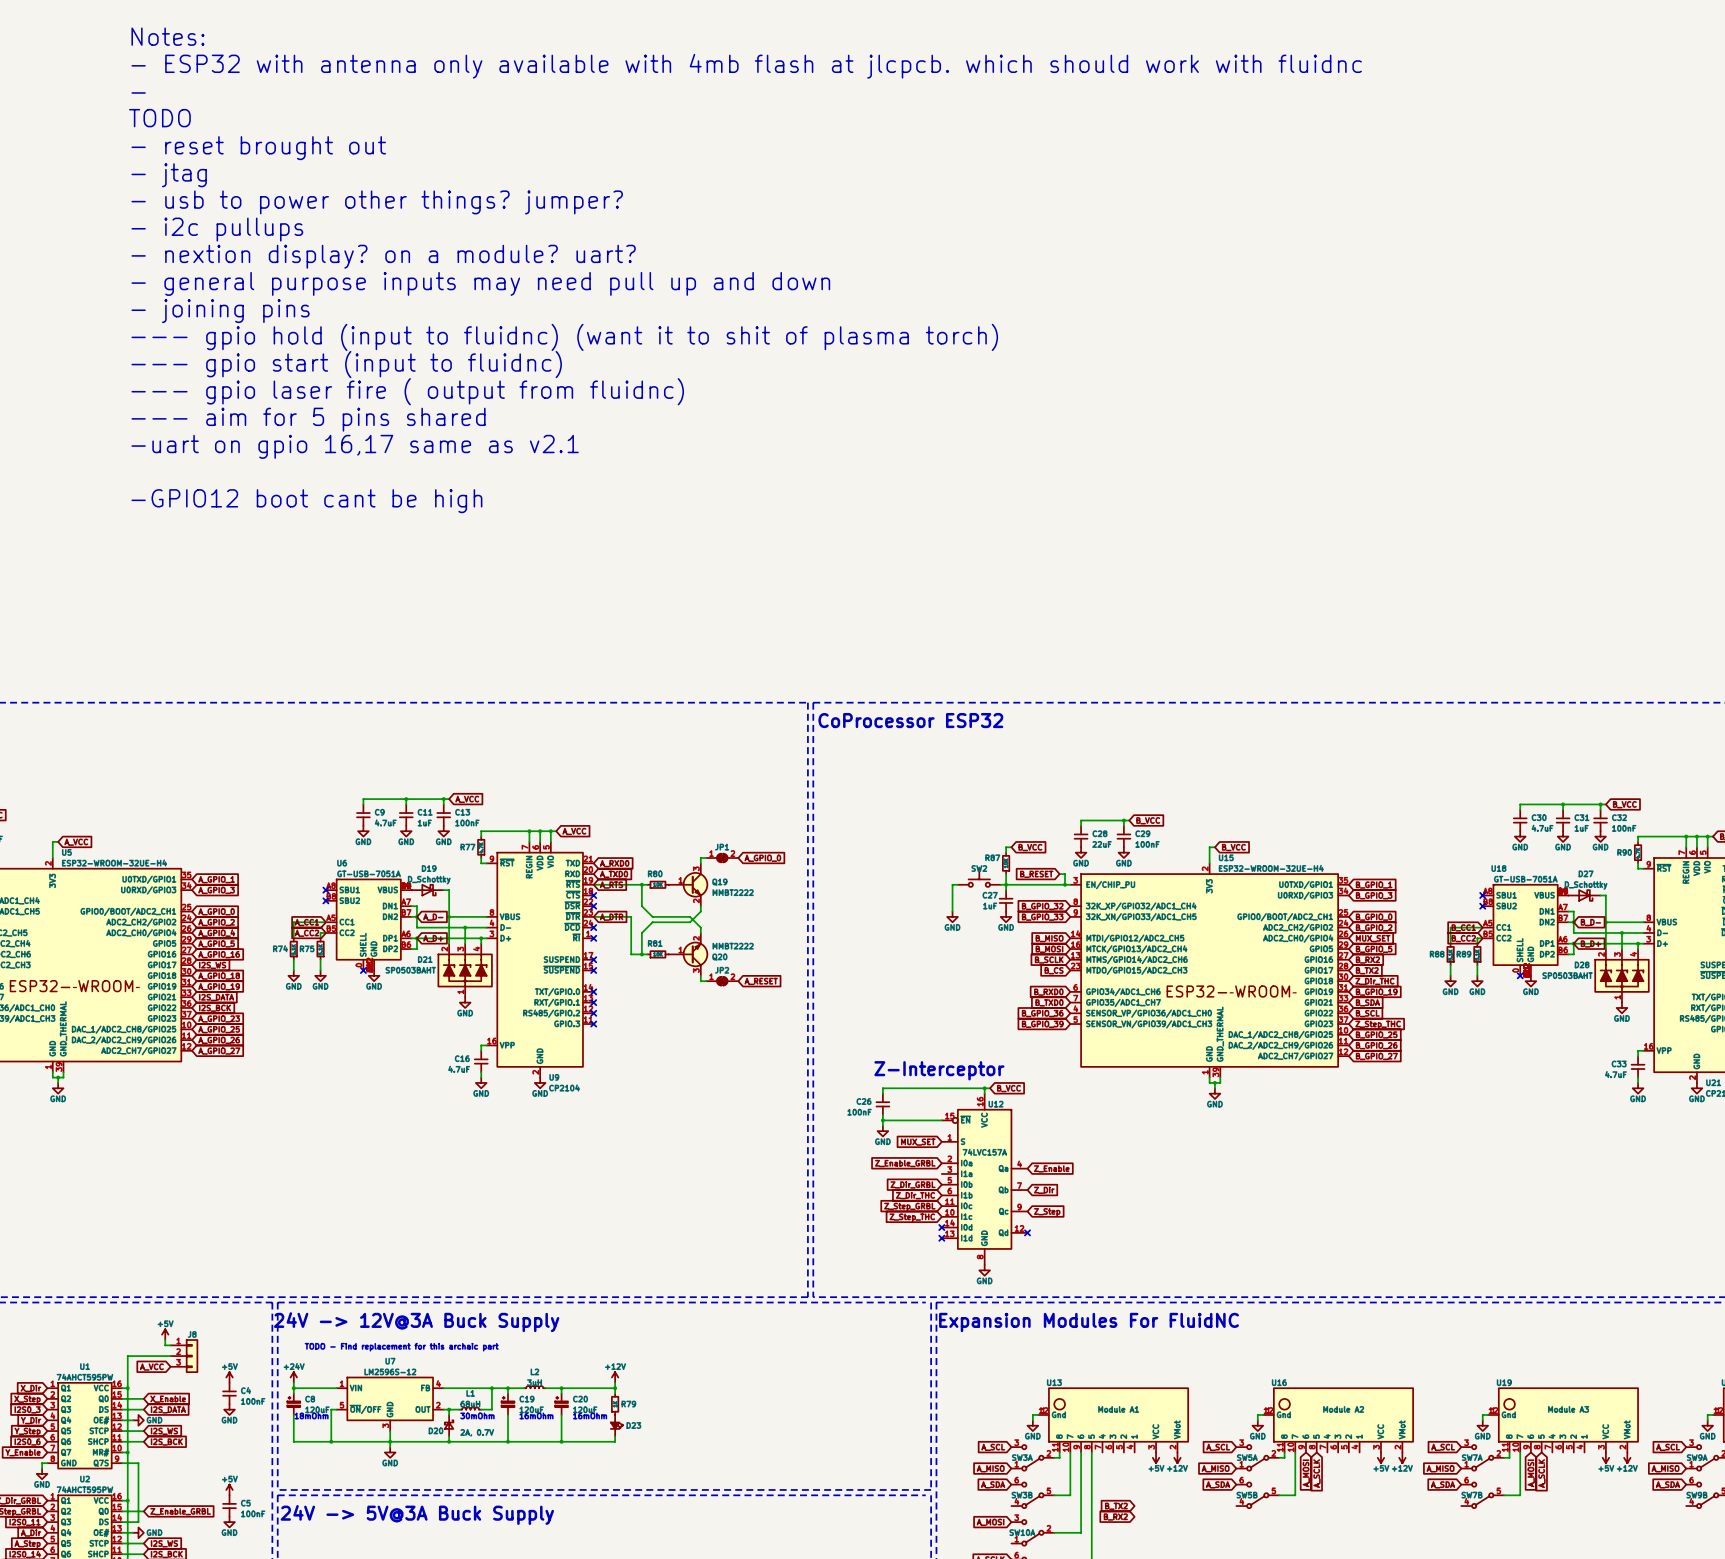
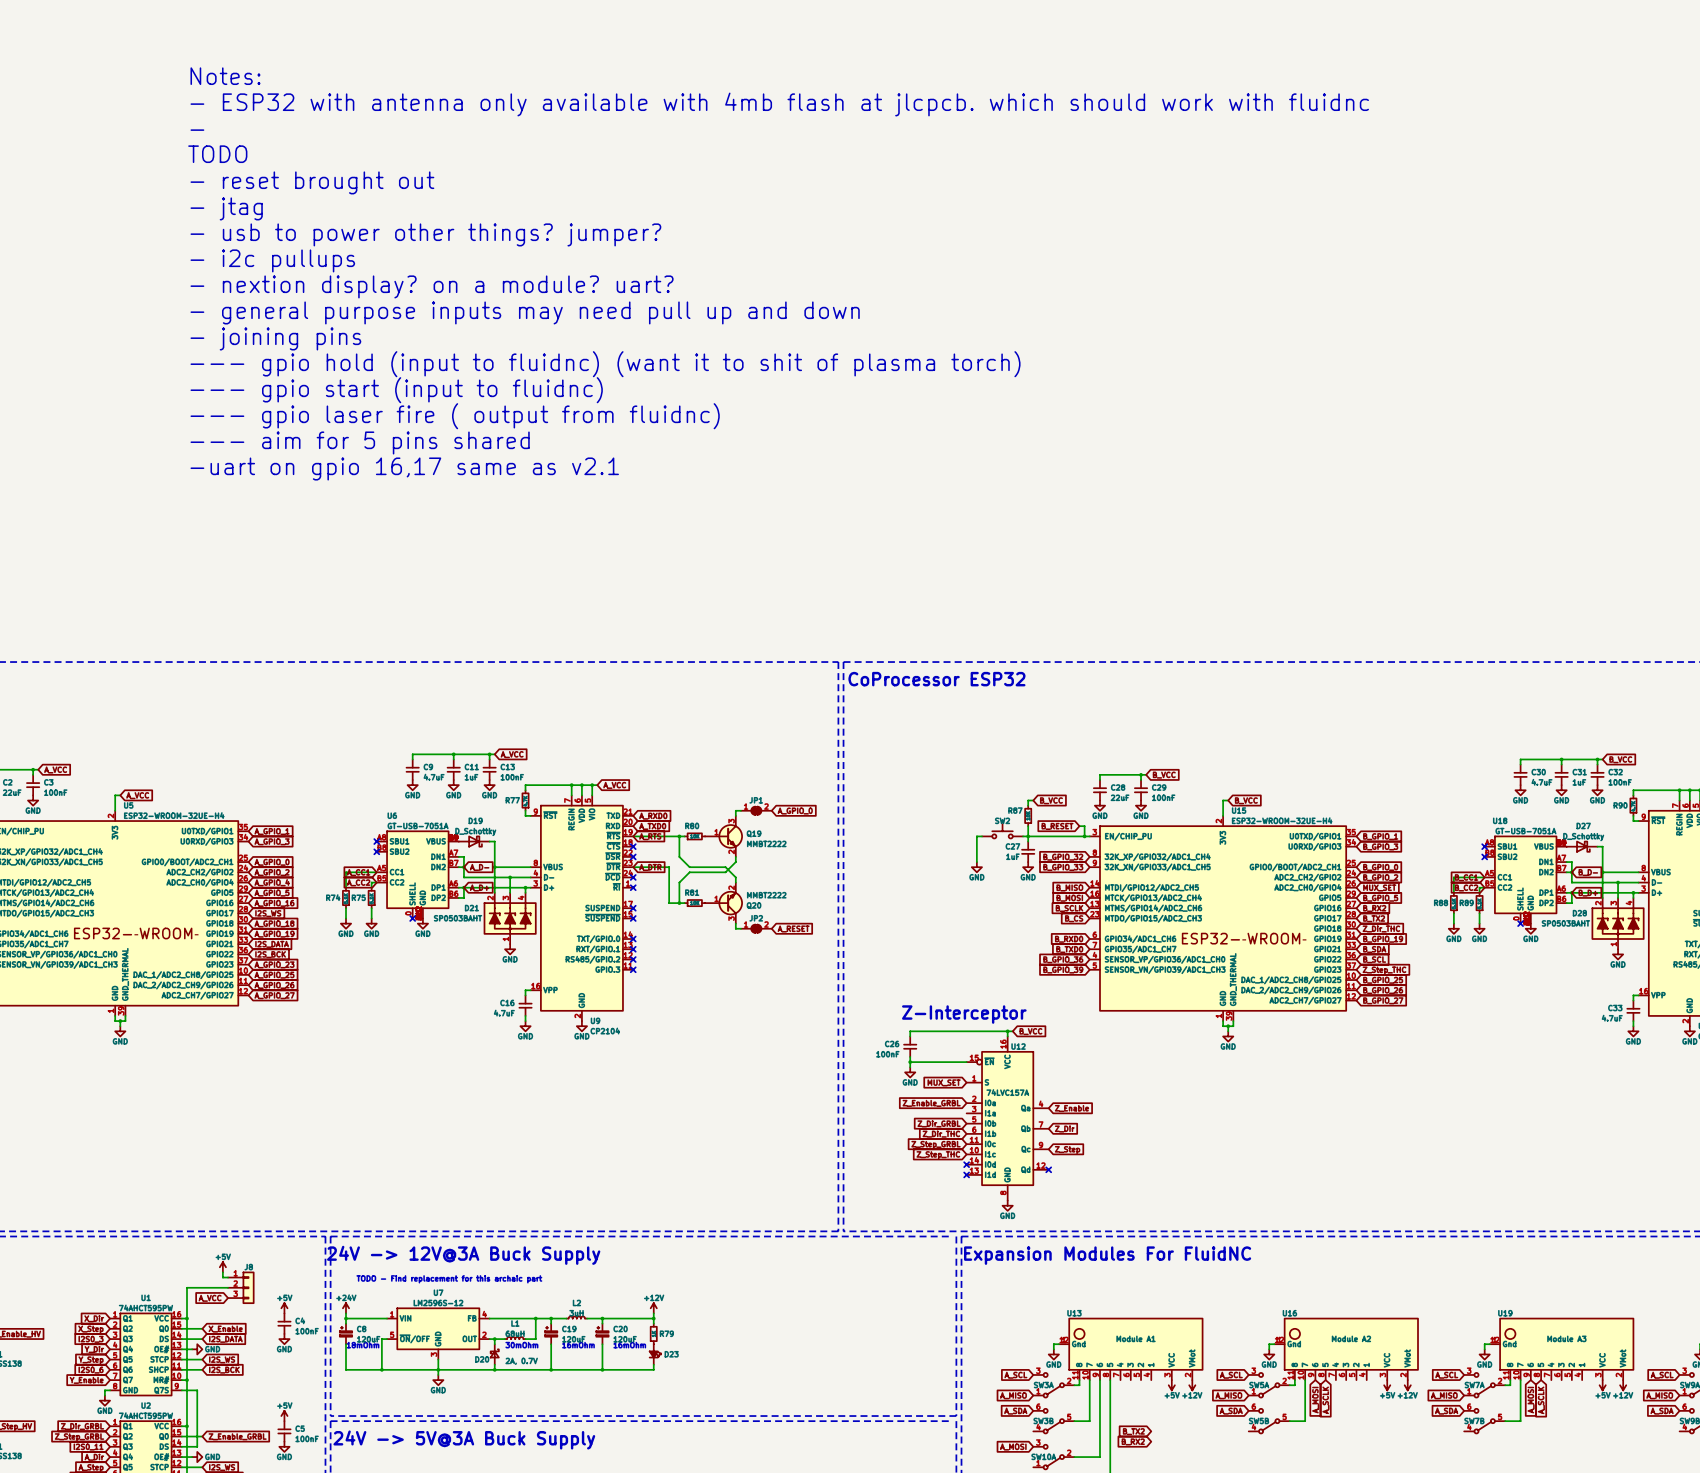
text: Notes: (167, 36) -> none
text: - ESP32 with antenna only available with 4mb flash at jlcpcb. which should work with fluidnc (746, 66) -> none
text: - (138, 92) -> Notes: (225, 76)
text: TODO (159, 118) -> - ESP32 with antenna only available with 4mb flash at jlcpcb. which should work with fluidnc (779, 104)
text: - reset brought out (258, 148) -> - (197, 130)
text: - jtag (169, 175) -> TODO (217, 154)
text: - usb to power other things? jumper? (377, 202) -> - reset brought out (312, 182)
text: - i2c pullups (217, 229) -> - jtag (226, 208)
text: - nextion display? on a module? uart? (383, 256) -> - usb to power other things? jumper? (425, 234)
text: - general purpose inputs may need pull up and down (480, 283) -> - i2c pullups (272, 260)
text: - joining pins (220, 311) -> - nextion display? on a module? uart? (432, 286)
text: --- gpio hold (input to fluidnc) (want it to shit of plasma torch) (564, 337) -> - general purpose inputs may need pull up and down (525, 312)
text: --- gpio start (input to fluidnc) (346, 364) -> - joining pins (275, 338)
text: --- gpio laser fire ( output from fluidnc) (407, 391) -> --- gpio hold (input to fluidnc) (want it to shit of plasma torch) (605, 364)
text: --- aim for 5 pins shared (308, 419) -> --- gpio start (input to fluidnc) (396, 390)
text: -uart on gpio 16,17 same as v2.1 (355, 446) -> --- gpio laser fire ( output from fluidnc) (455, 416)
text: none -> --- aim for 5 pins shared (360, 442)
text: -GPIO12 boot cant be high (306, 501) -> -uart on gpio 16,17 same as v2.1 (404, 469)

